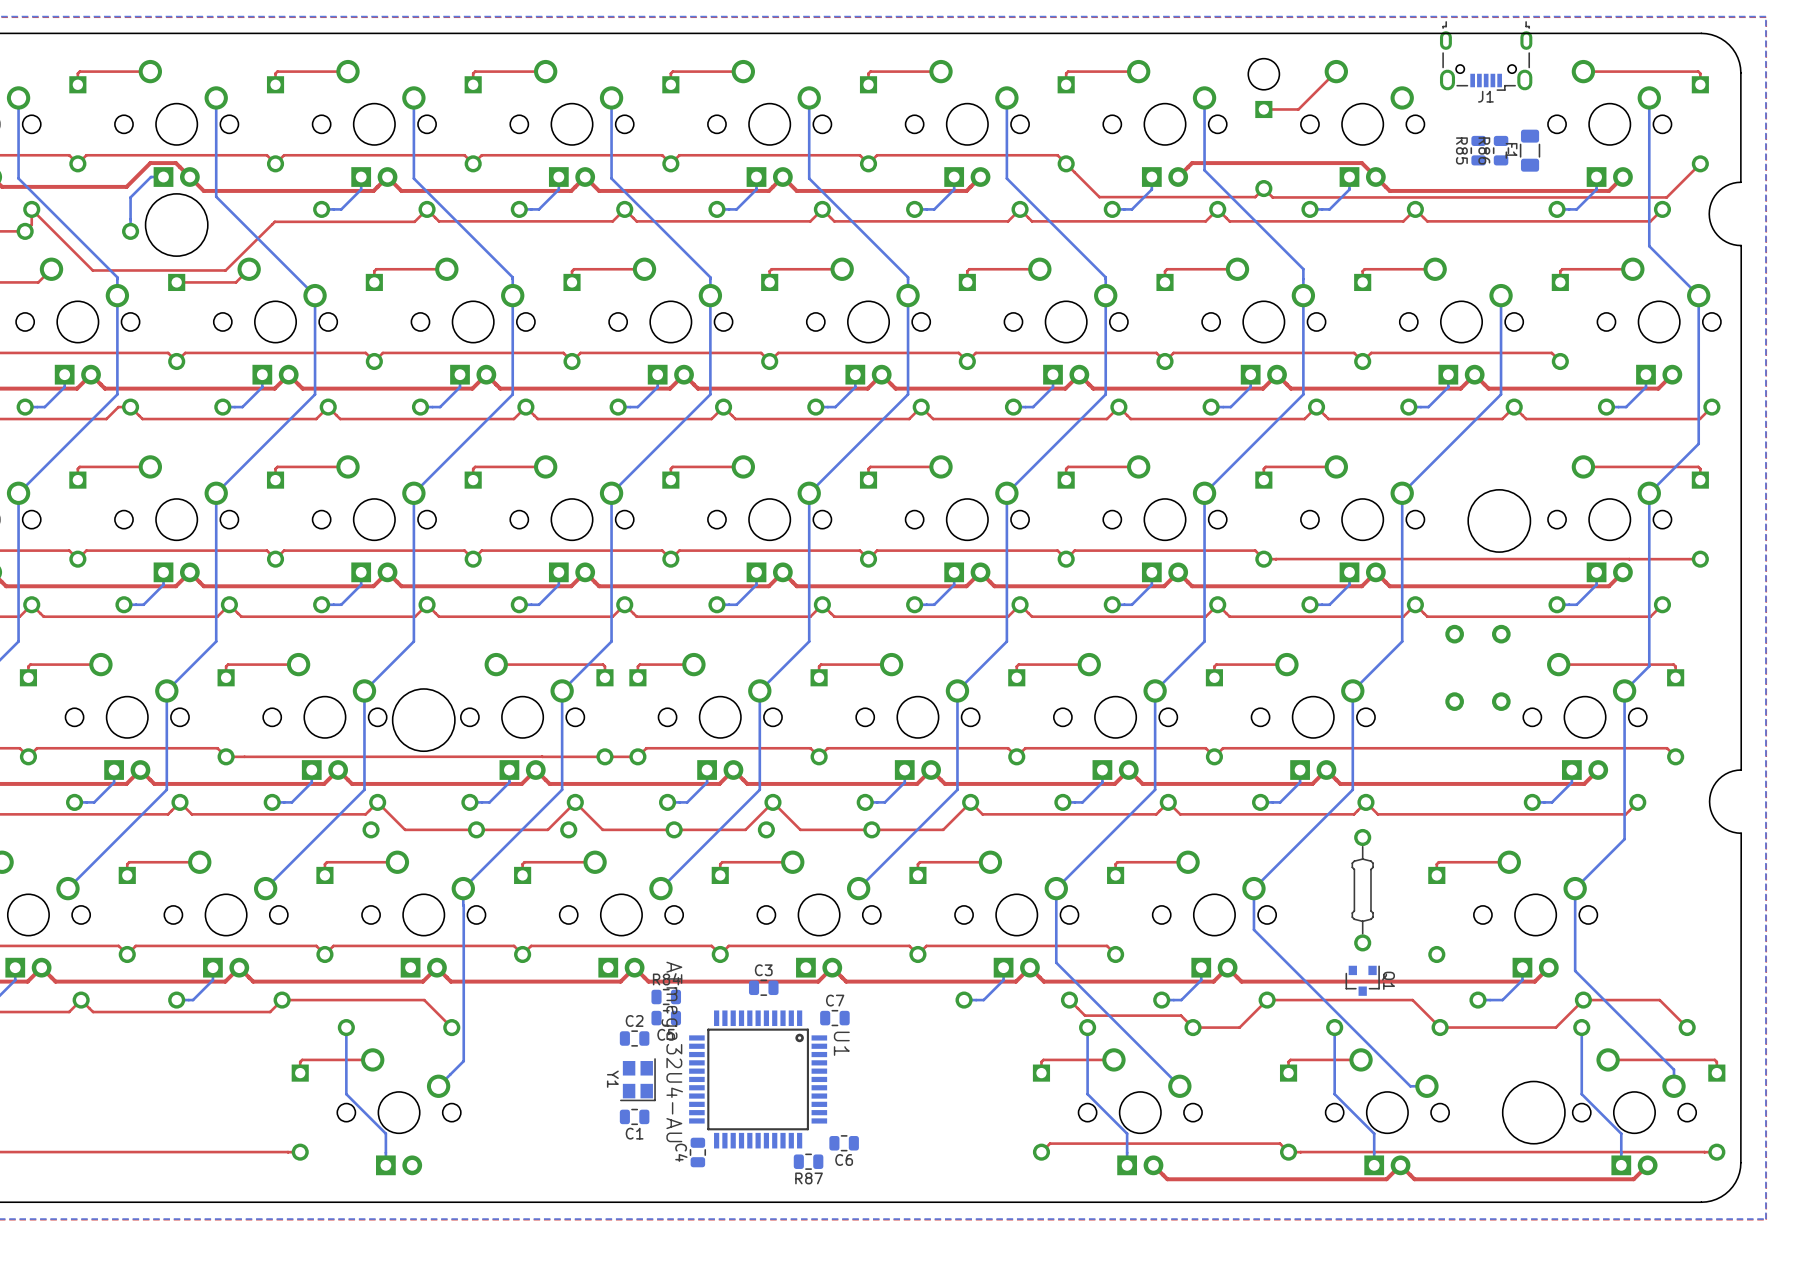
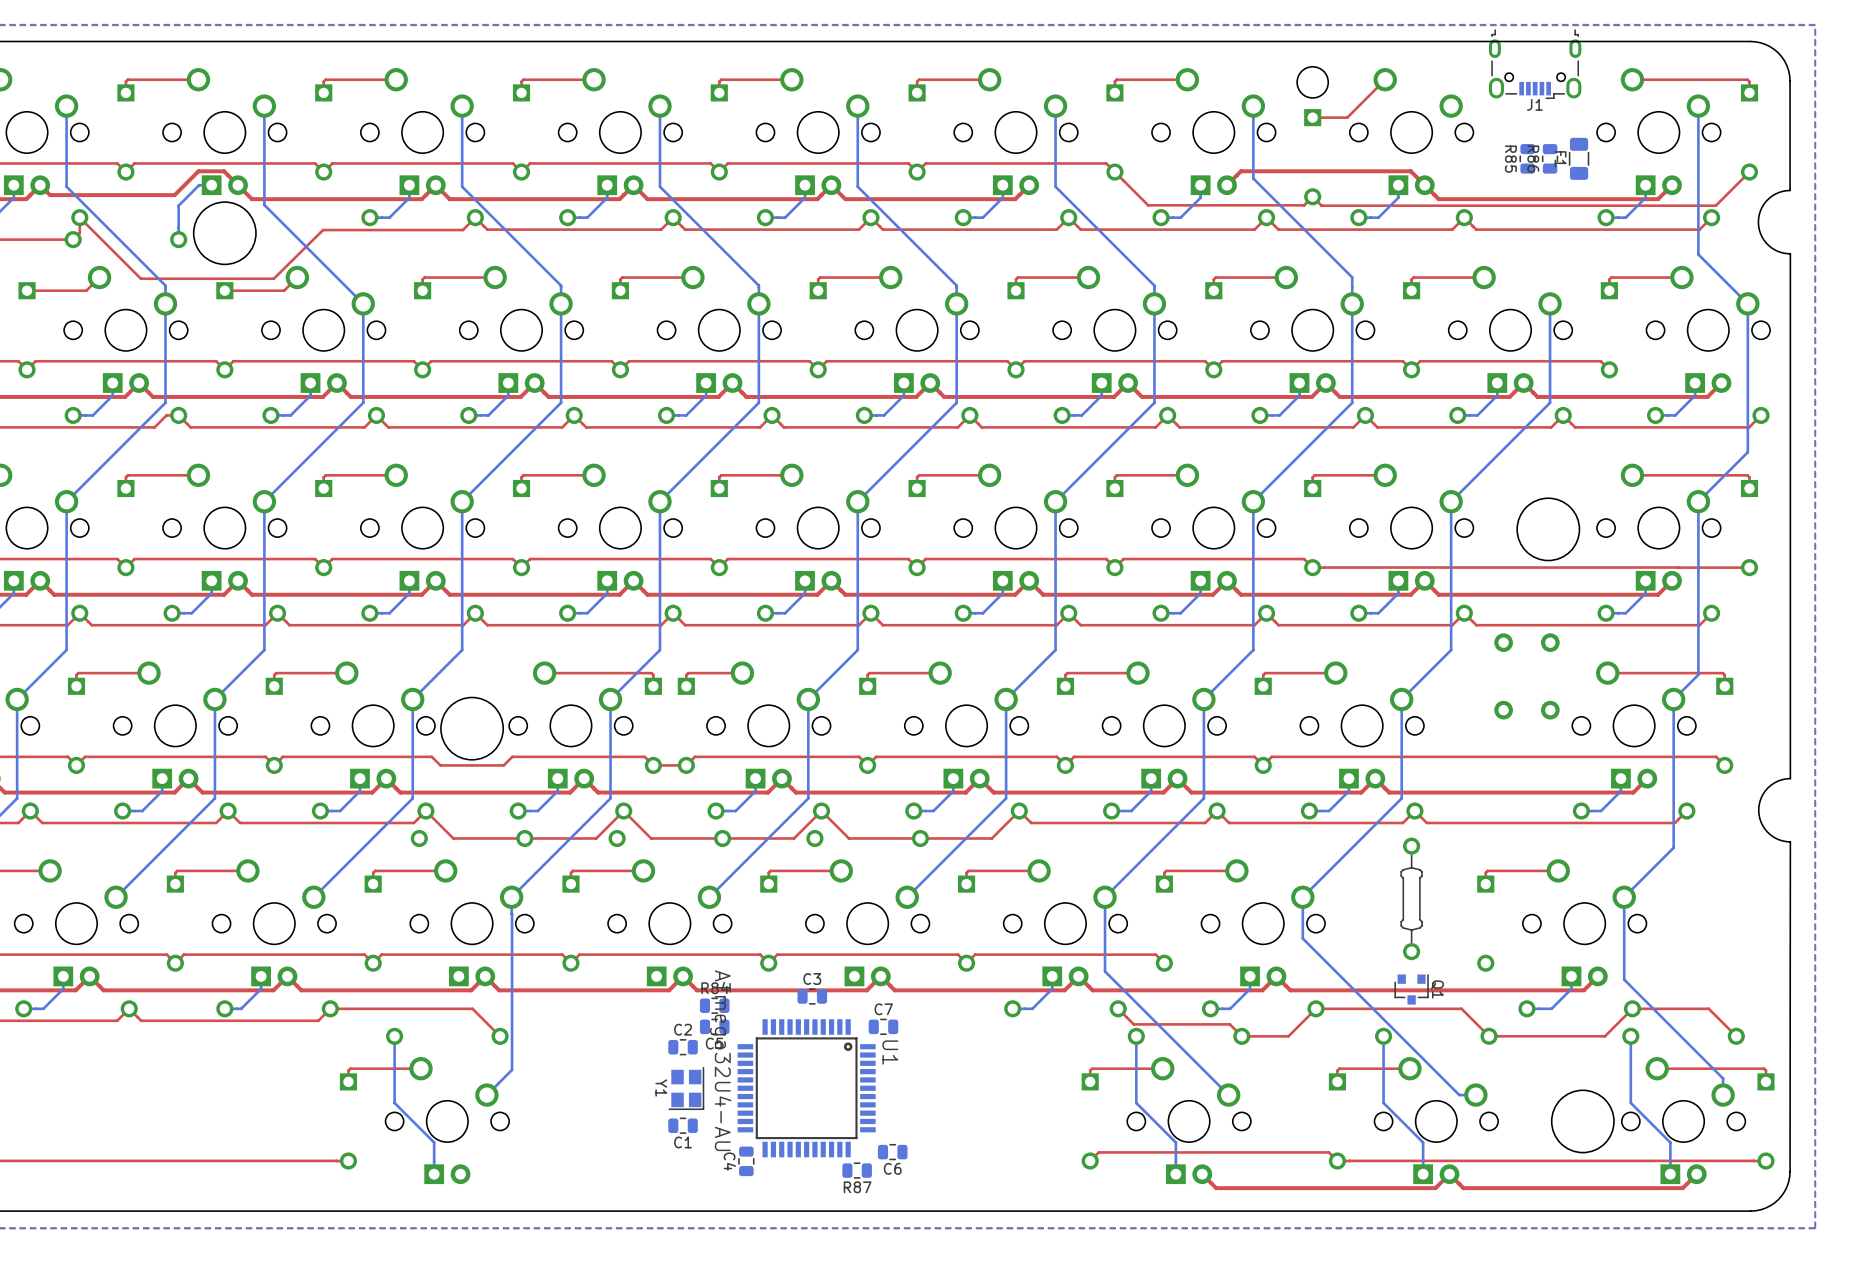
top track: (542, 756) (226, 756) -> (653, 765) (644, 756) (512, 756) (503, 765) (440, 765) (431, 756) (282, 756) (274, 765)
top track: (604, 756) (542, 756) -> none

